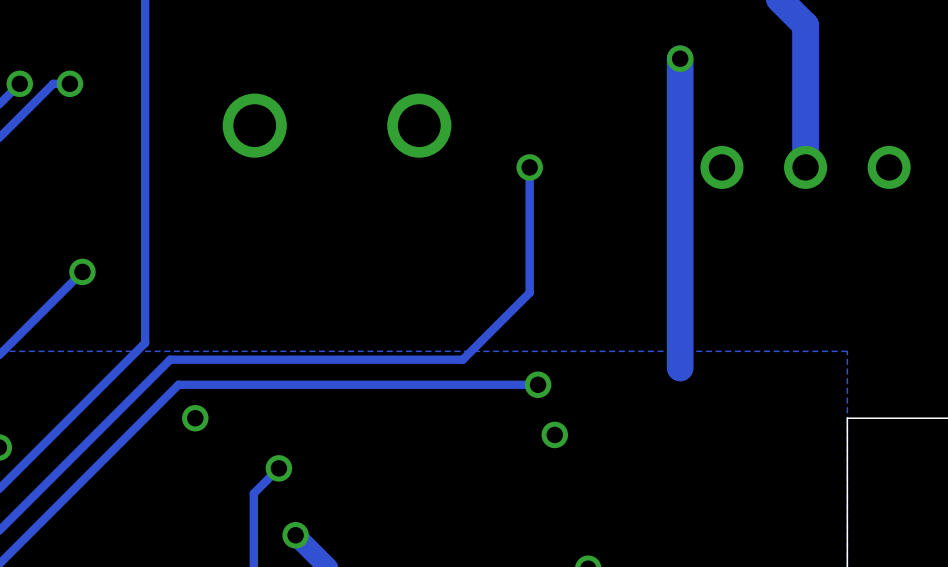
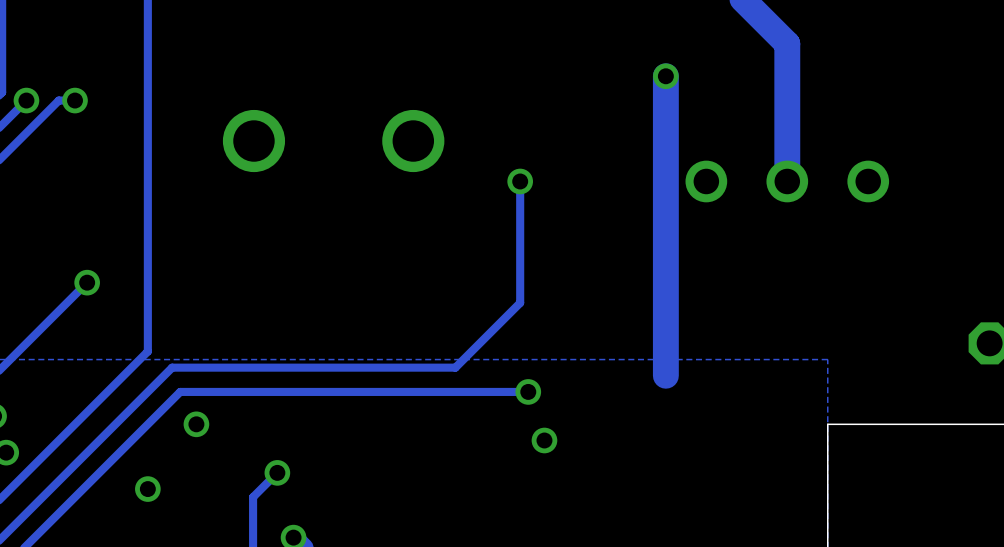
via: none -> (147, 489)

